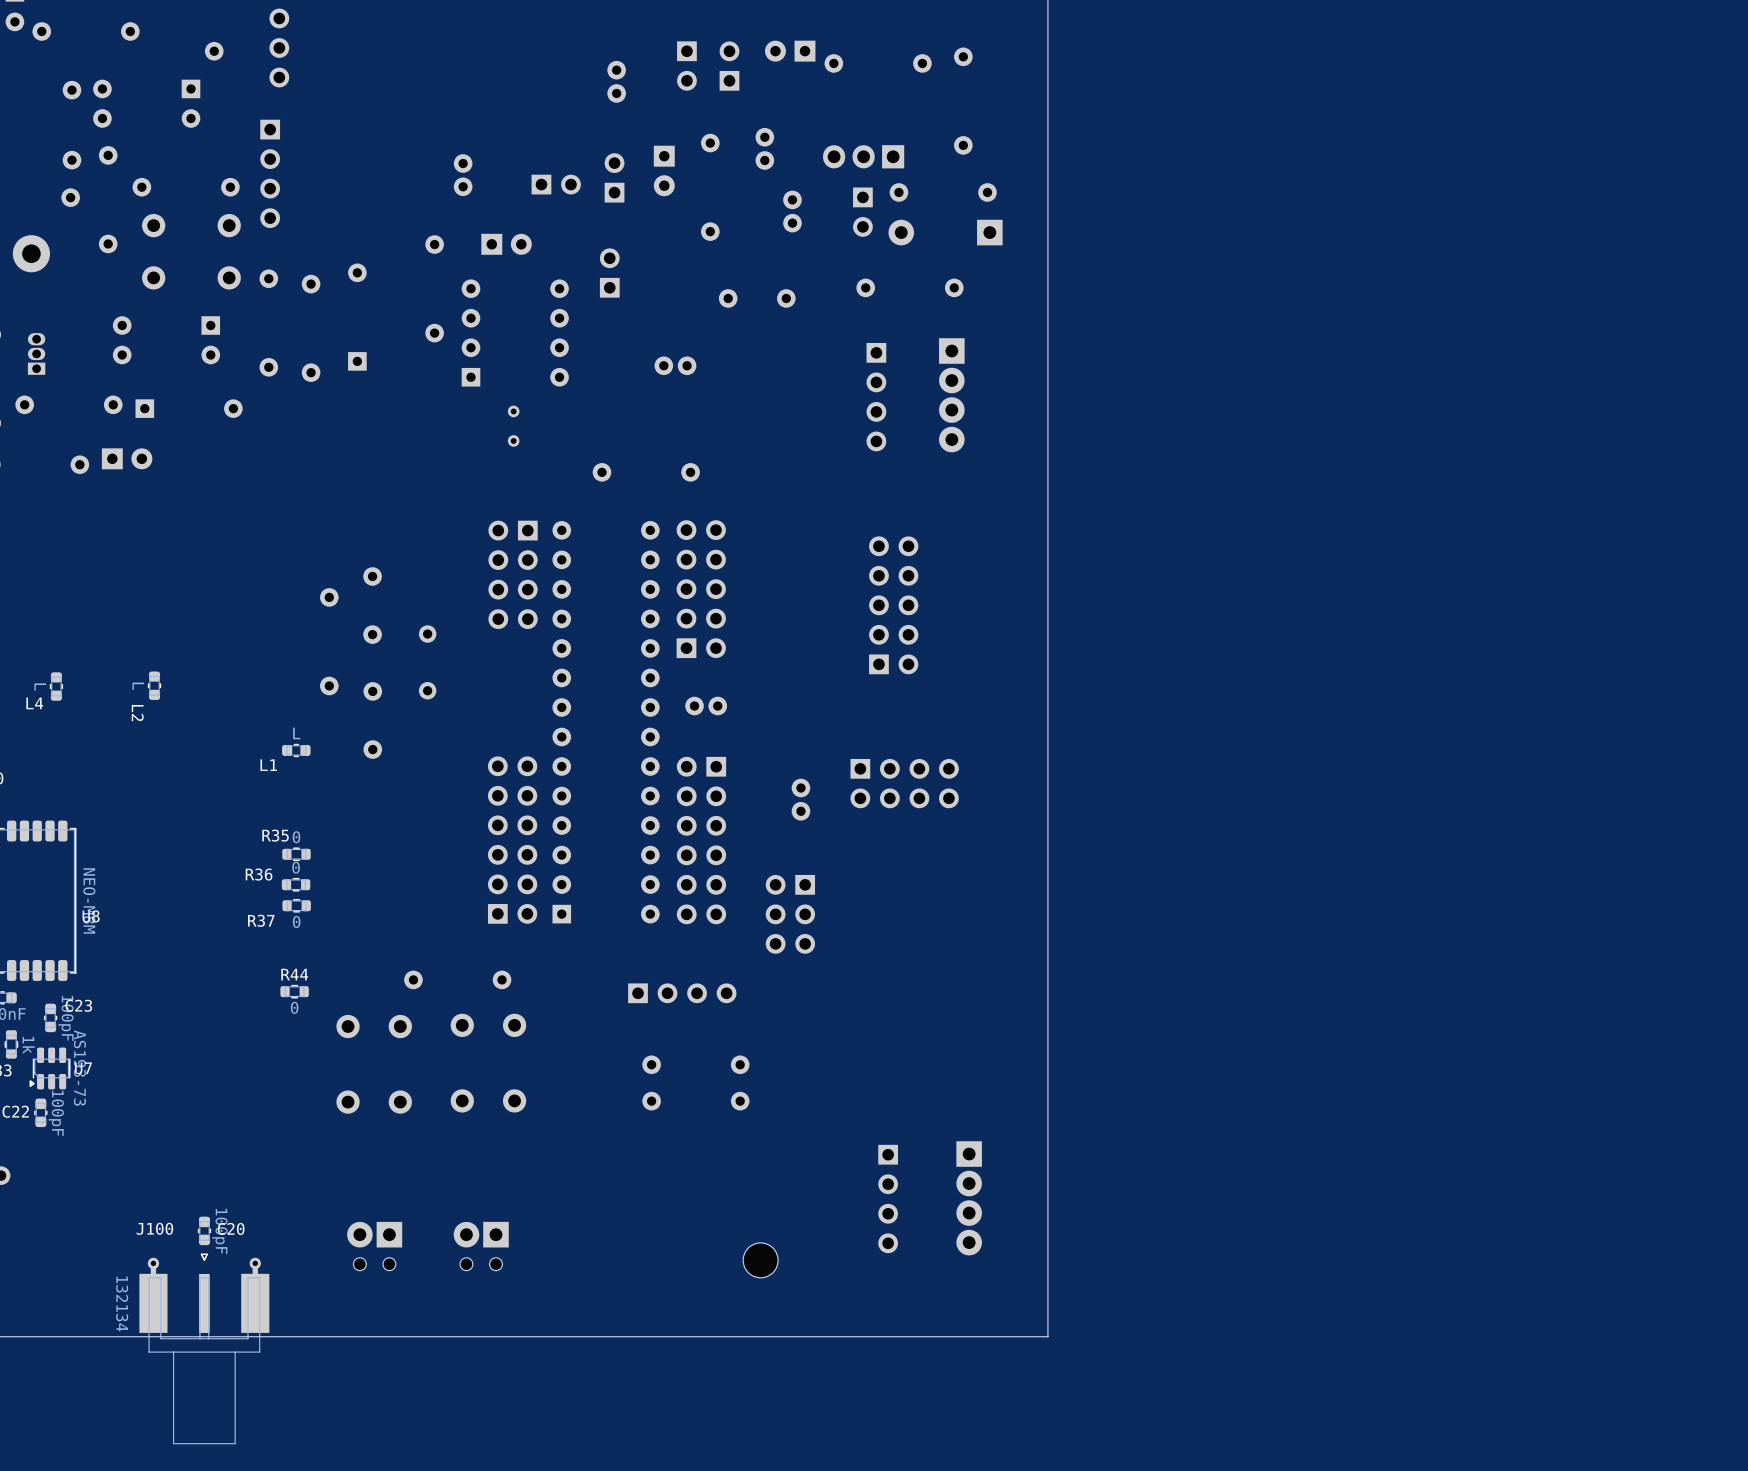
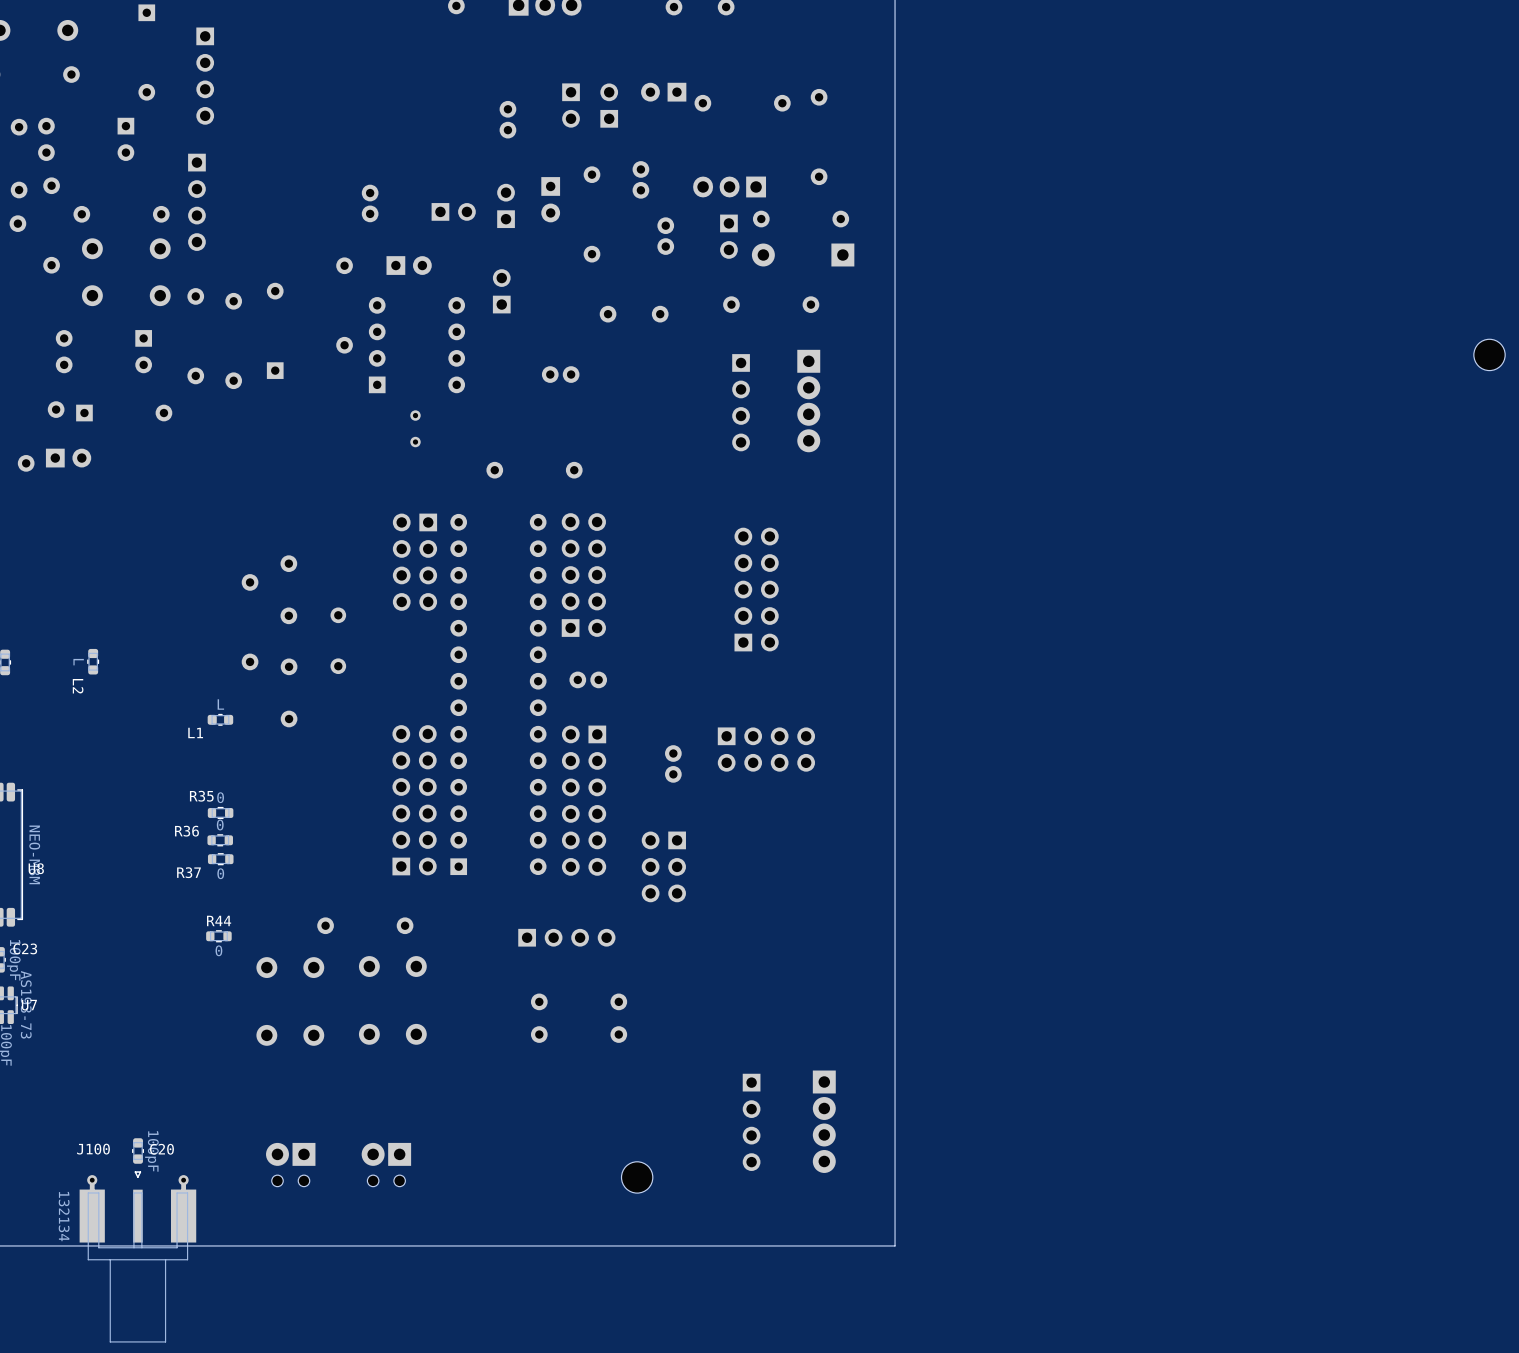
part: none -> (1489, 354)

